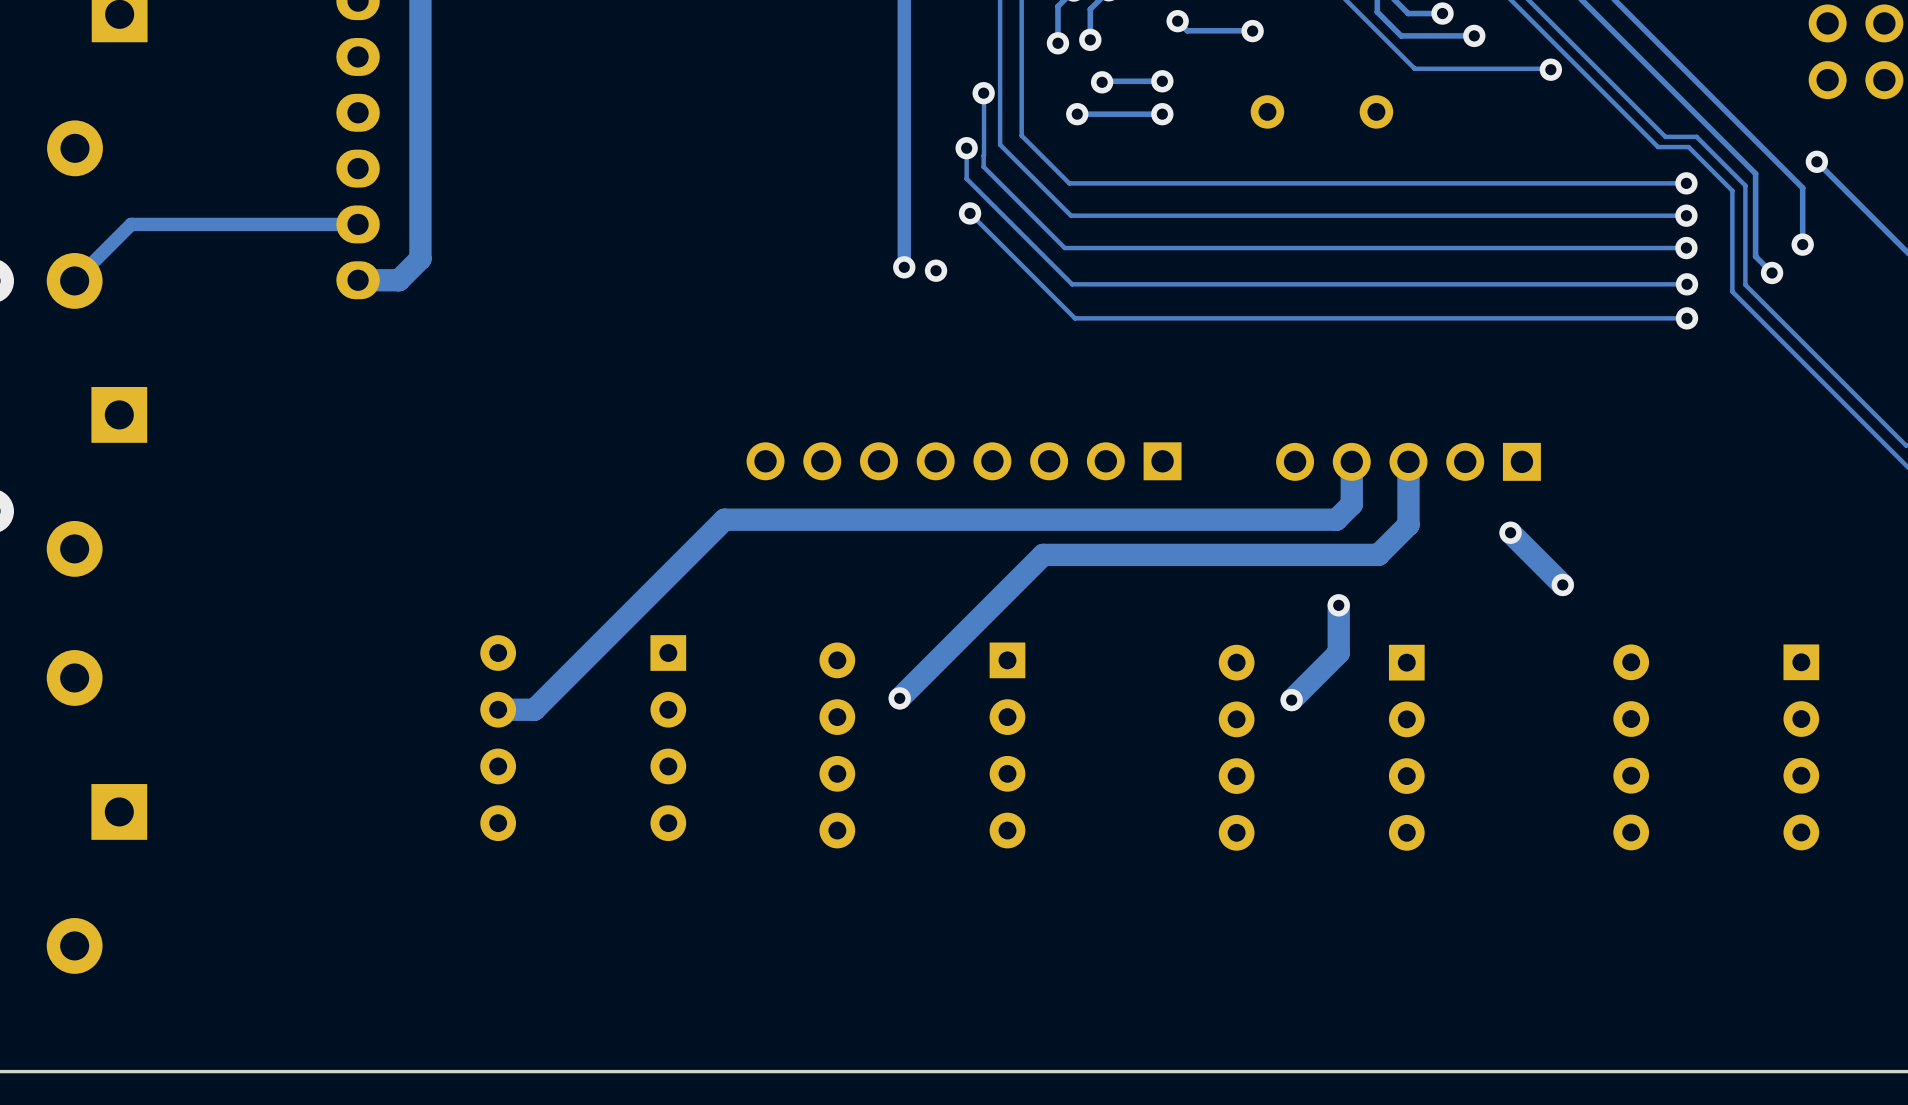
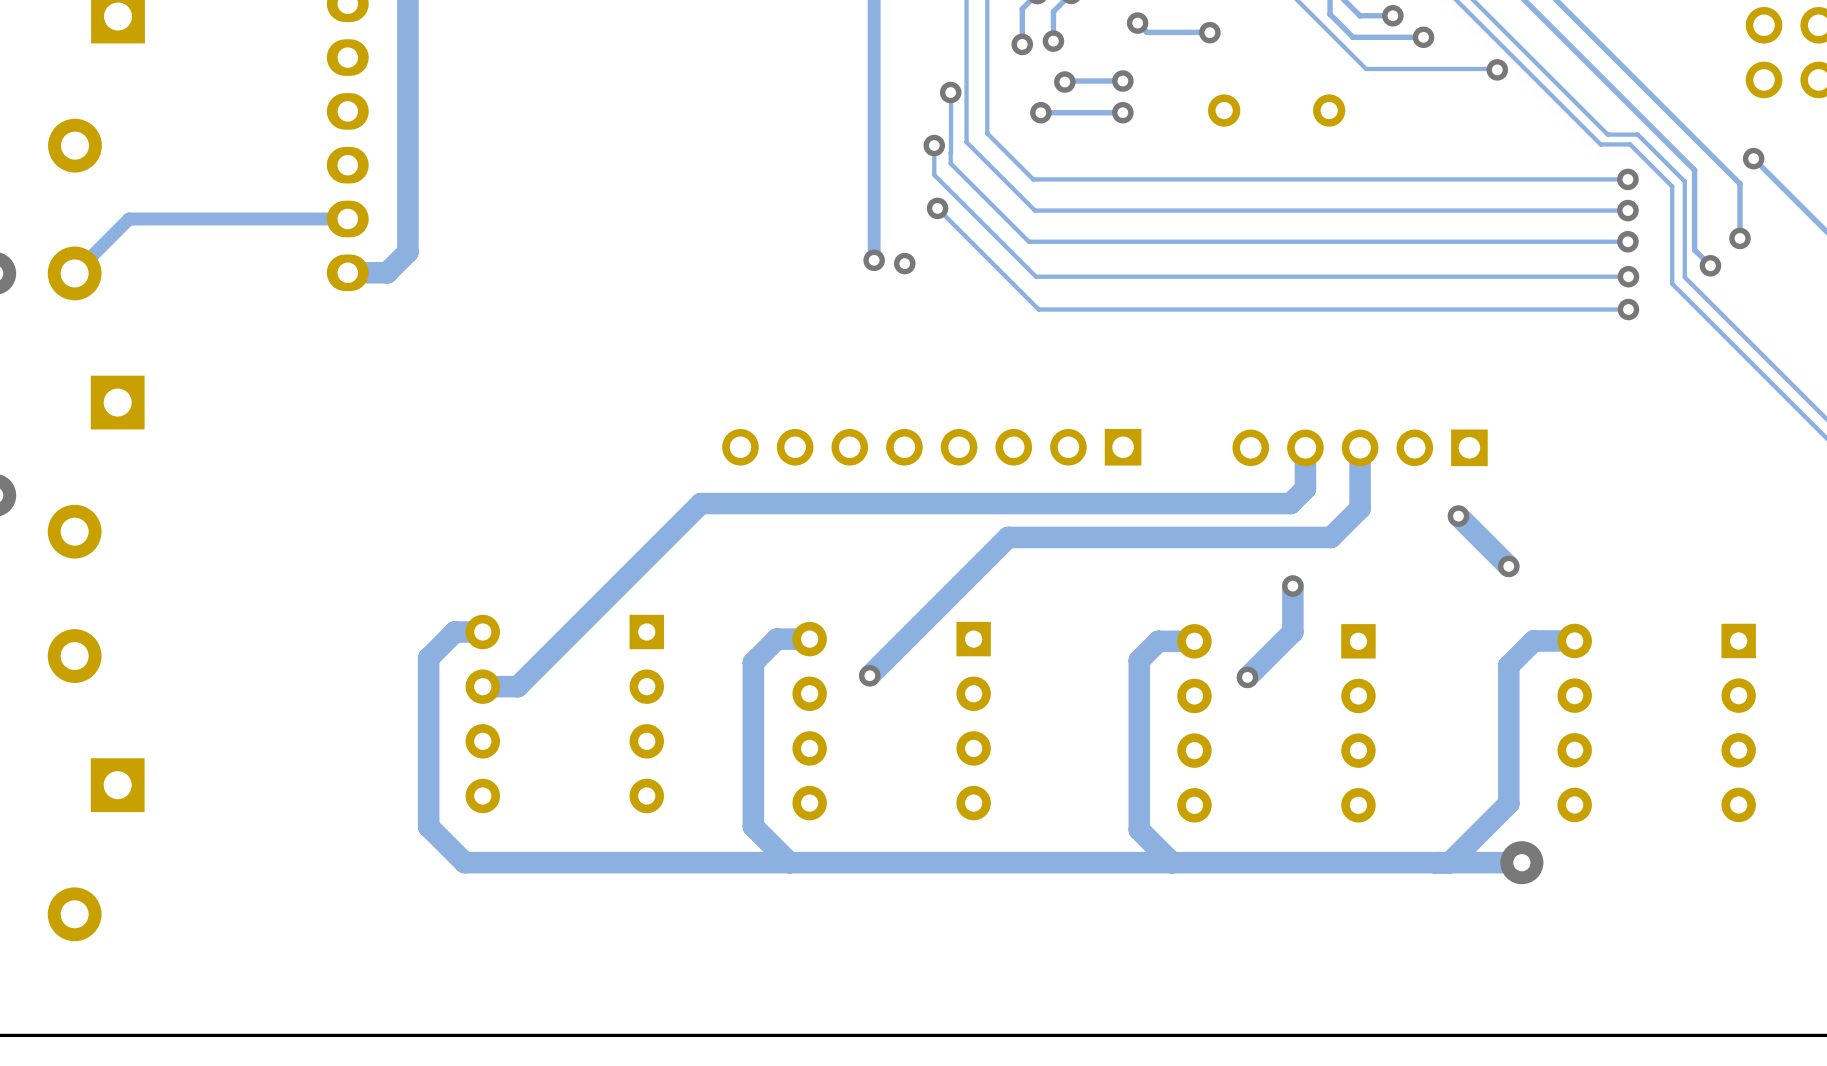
track: none -> (482, 632) (454, 632) (428, 658) (428, 826) (464, 862) (1521, 862)
track: none -> (809, 639) (776, 639) (753, 662) (753, 826) (789, 862)
track: none -> (1194, 641) (1158, 641) (1139, 660) (1139, 829) (1172, 862)
track: none -> (1574, 640) (1533, 640) (1508, 665) (1508, 803) (1449, 862)
via: none -> (1521, 862)

